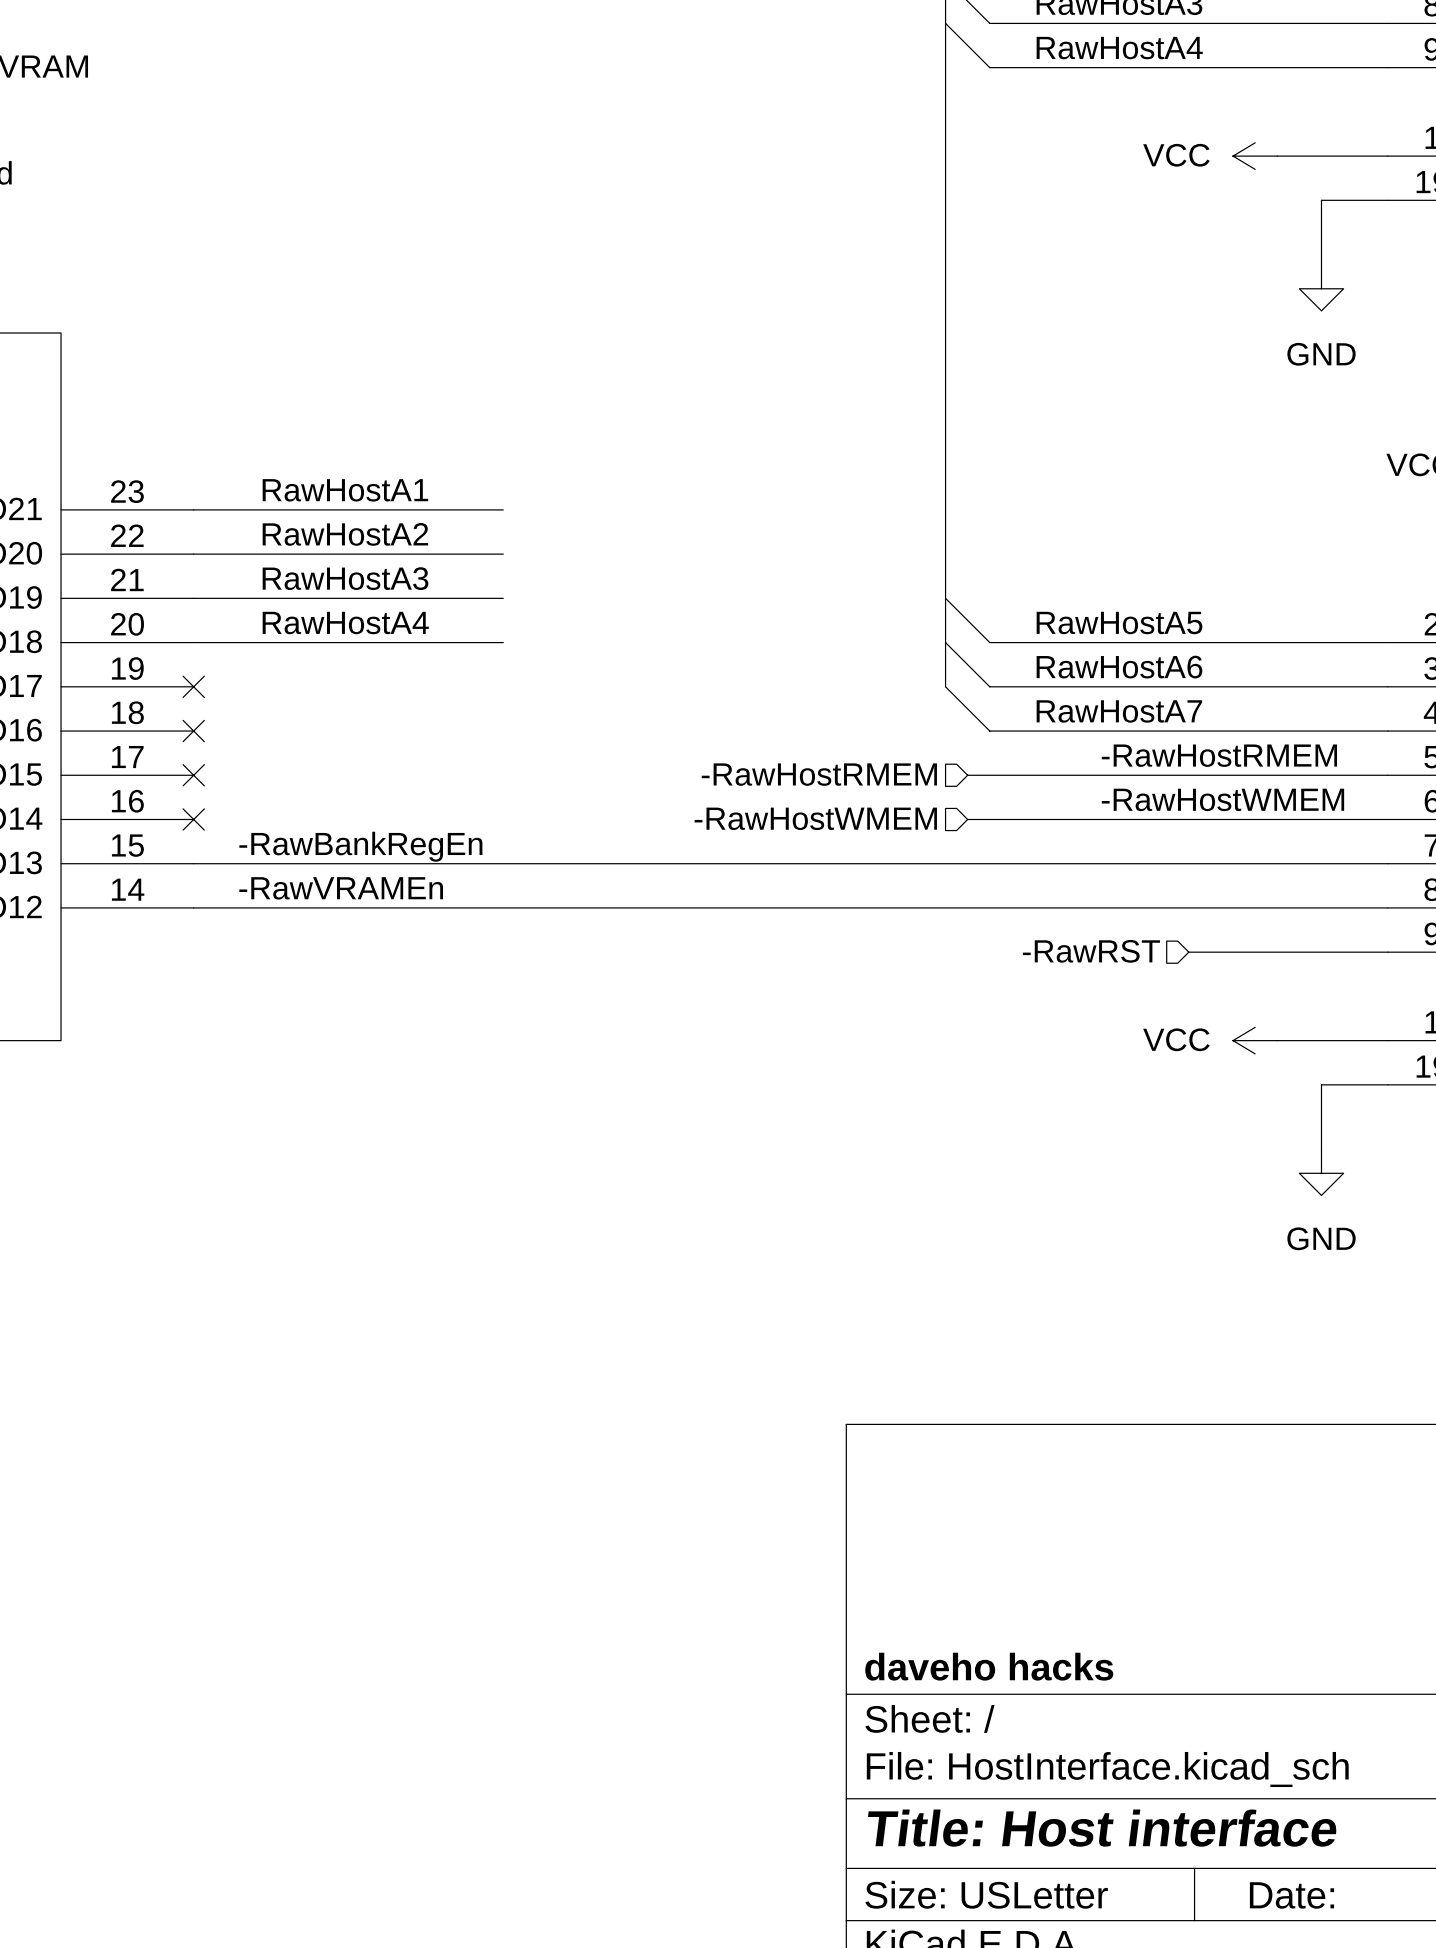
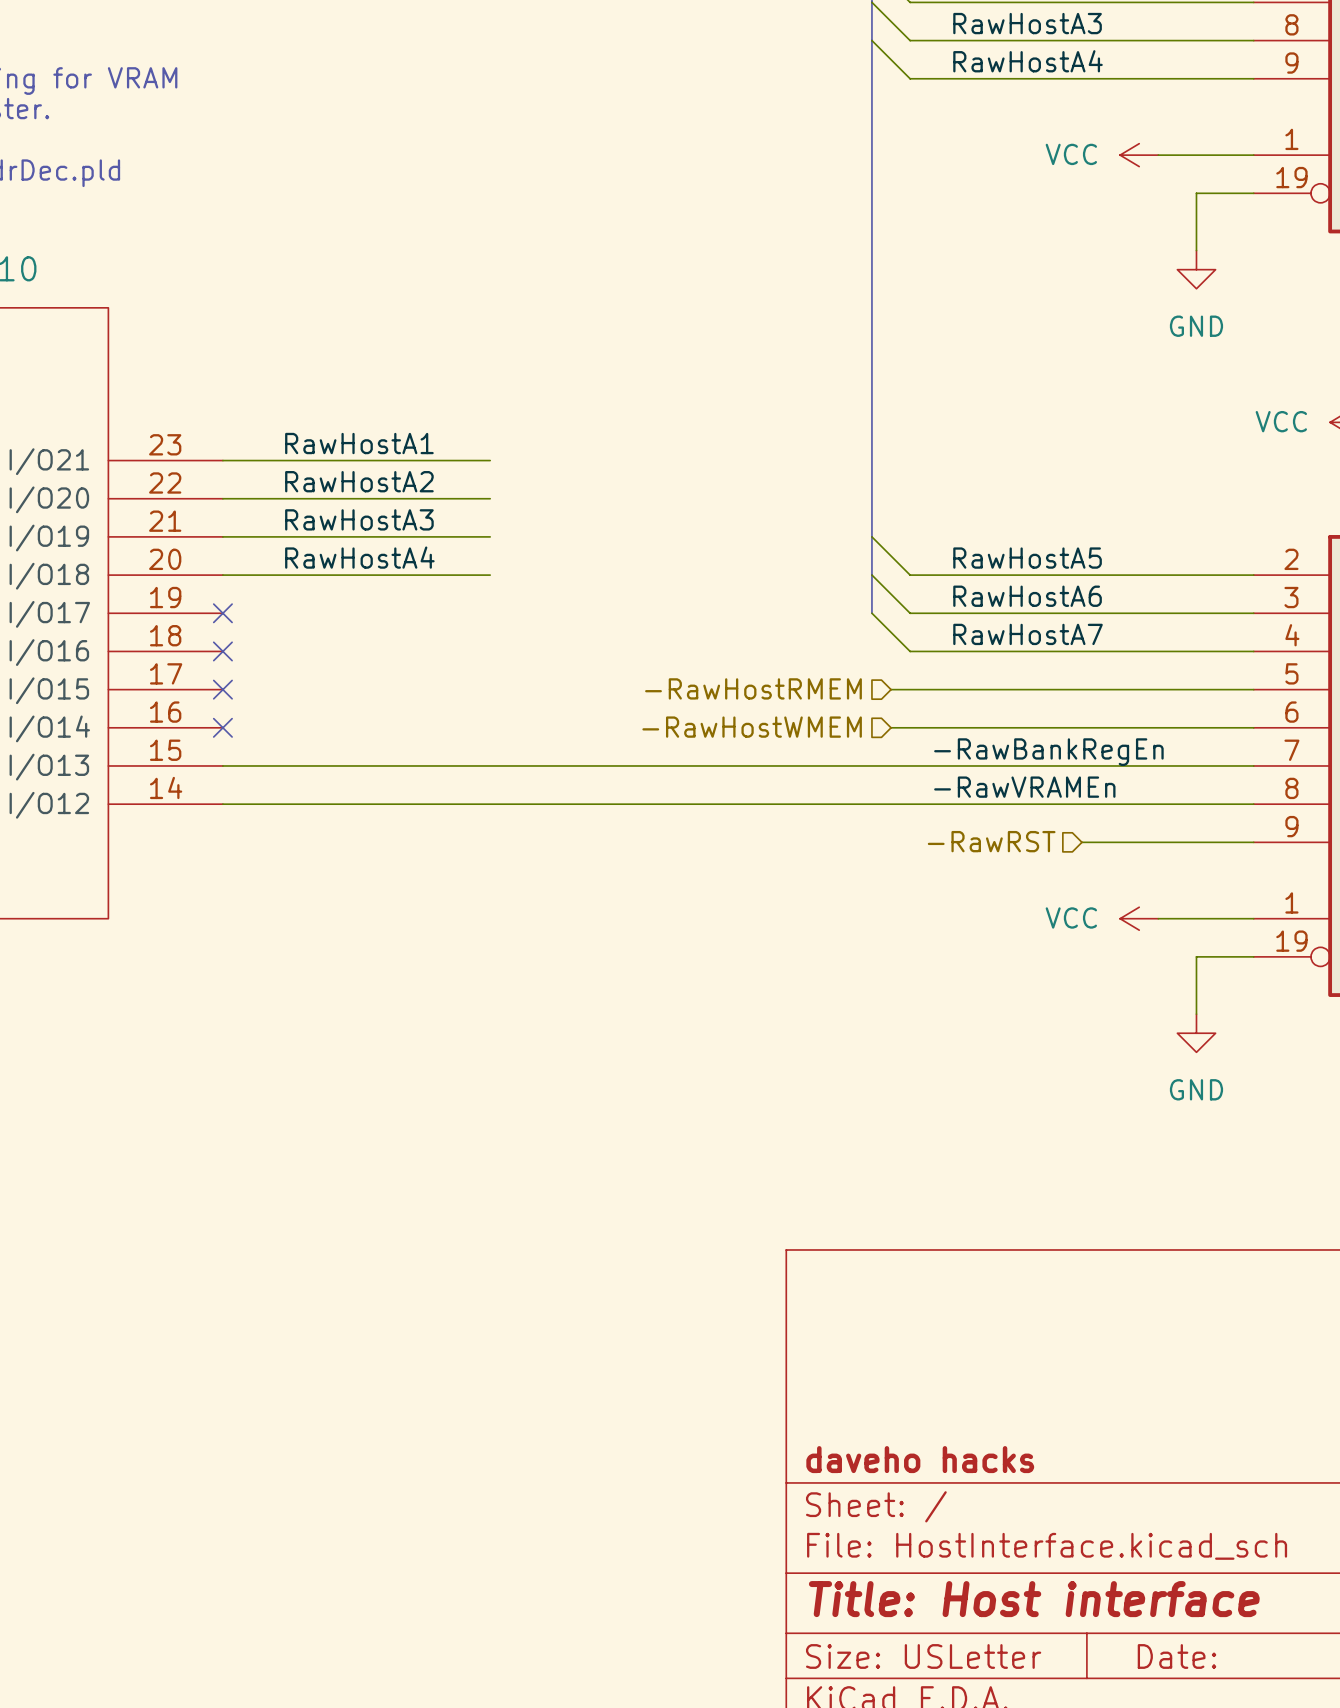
label: -RawHostRMEM (1219, 755) -> none
label: -RawHostWMEM (1222, 799) -> none
label: -RawBankRegEn (360, 846) -> none
label: none -> -RawBankRegEn (1048, 752)
label: -RawVRAMEn (341, 888) -> none
label: none -> -RawVRAMEn (1024, 787)

